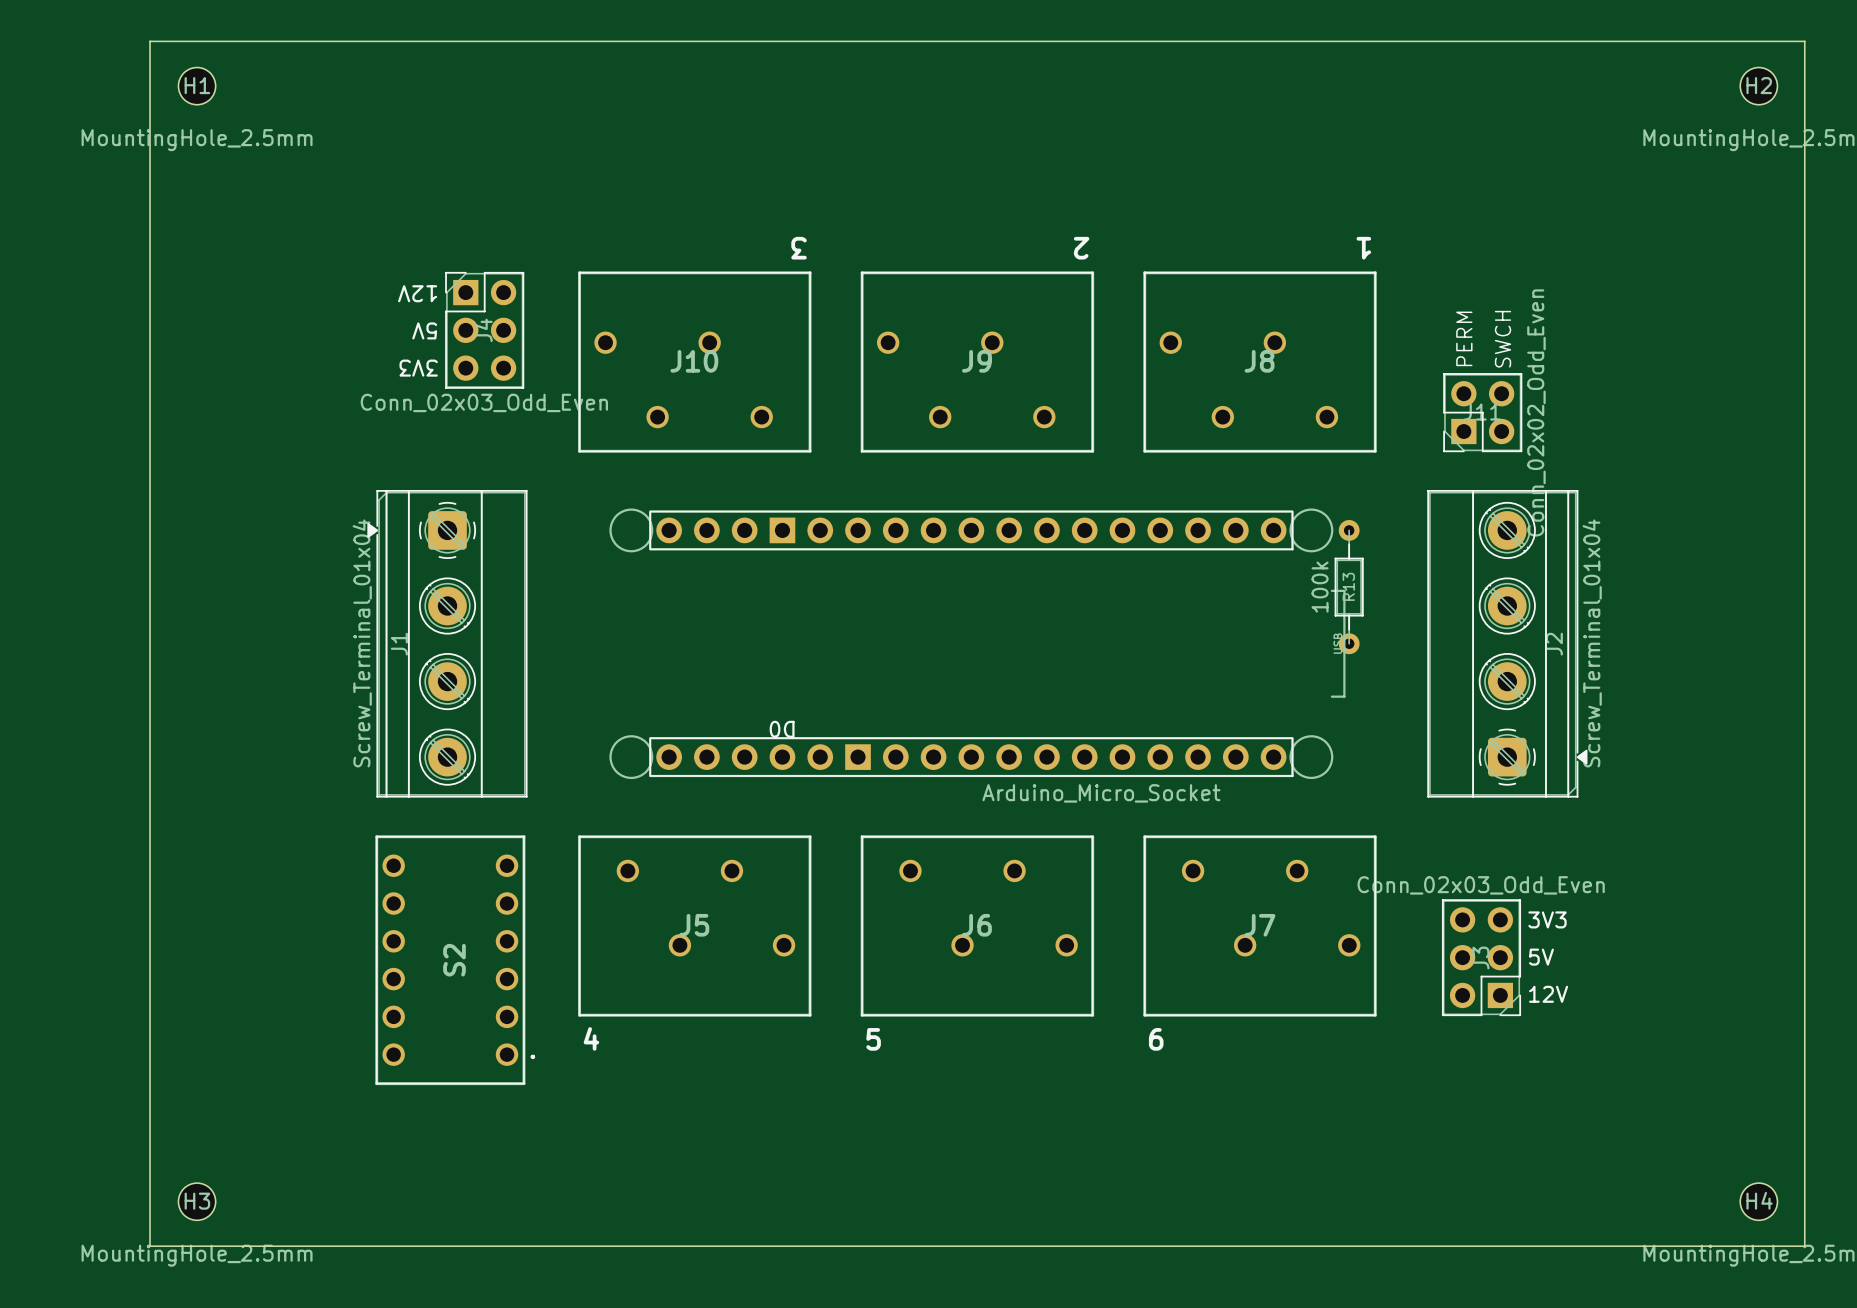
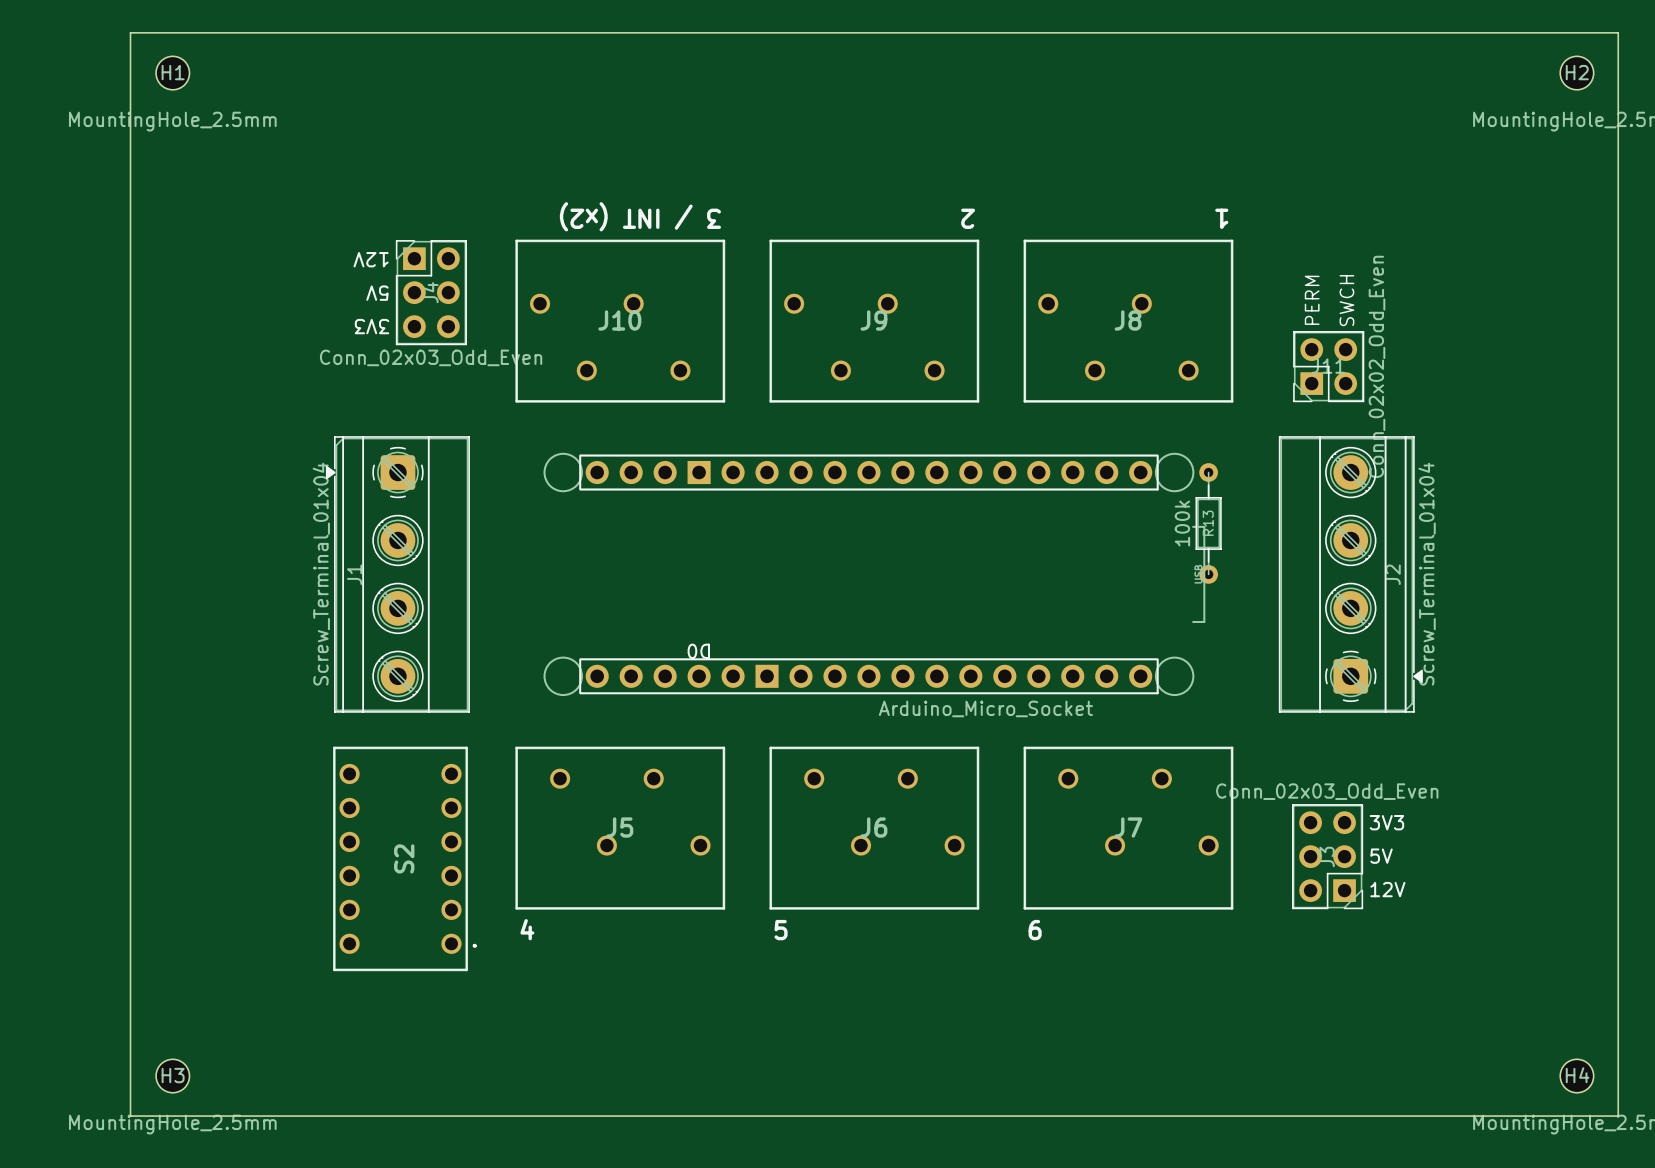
text: 3 (799, 248) -> 3 / INT (x2) (640, 216)

